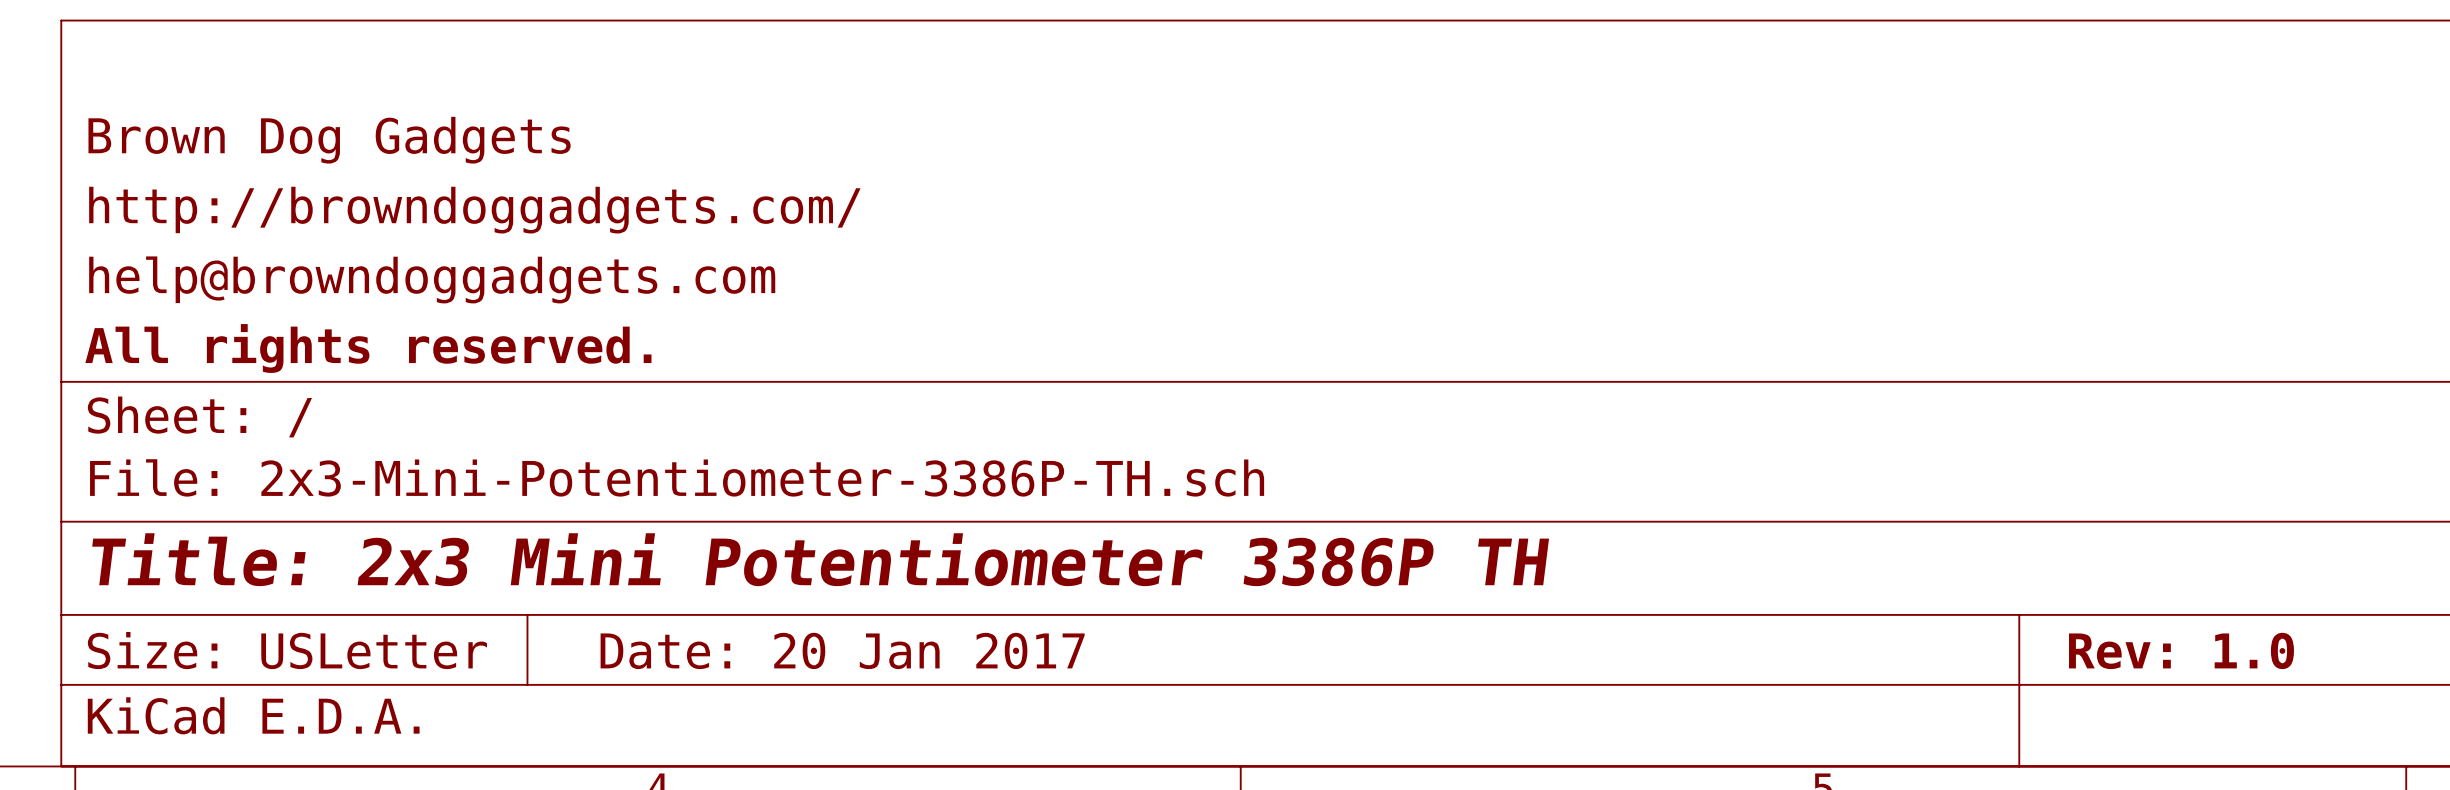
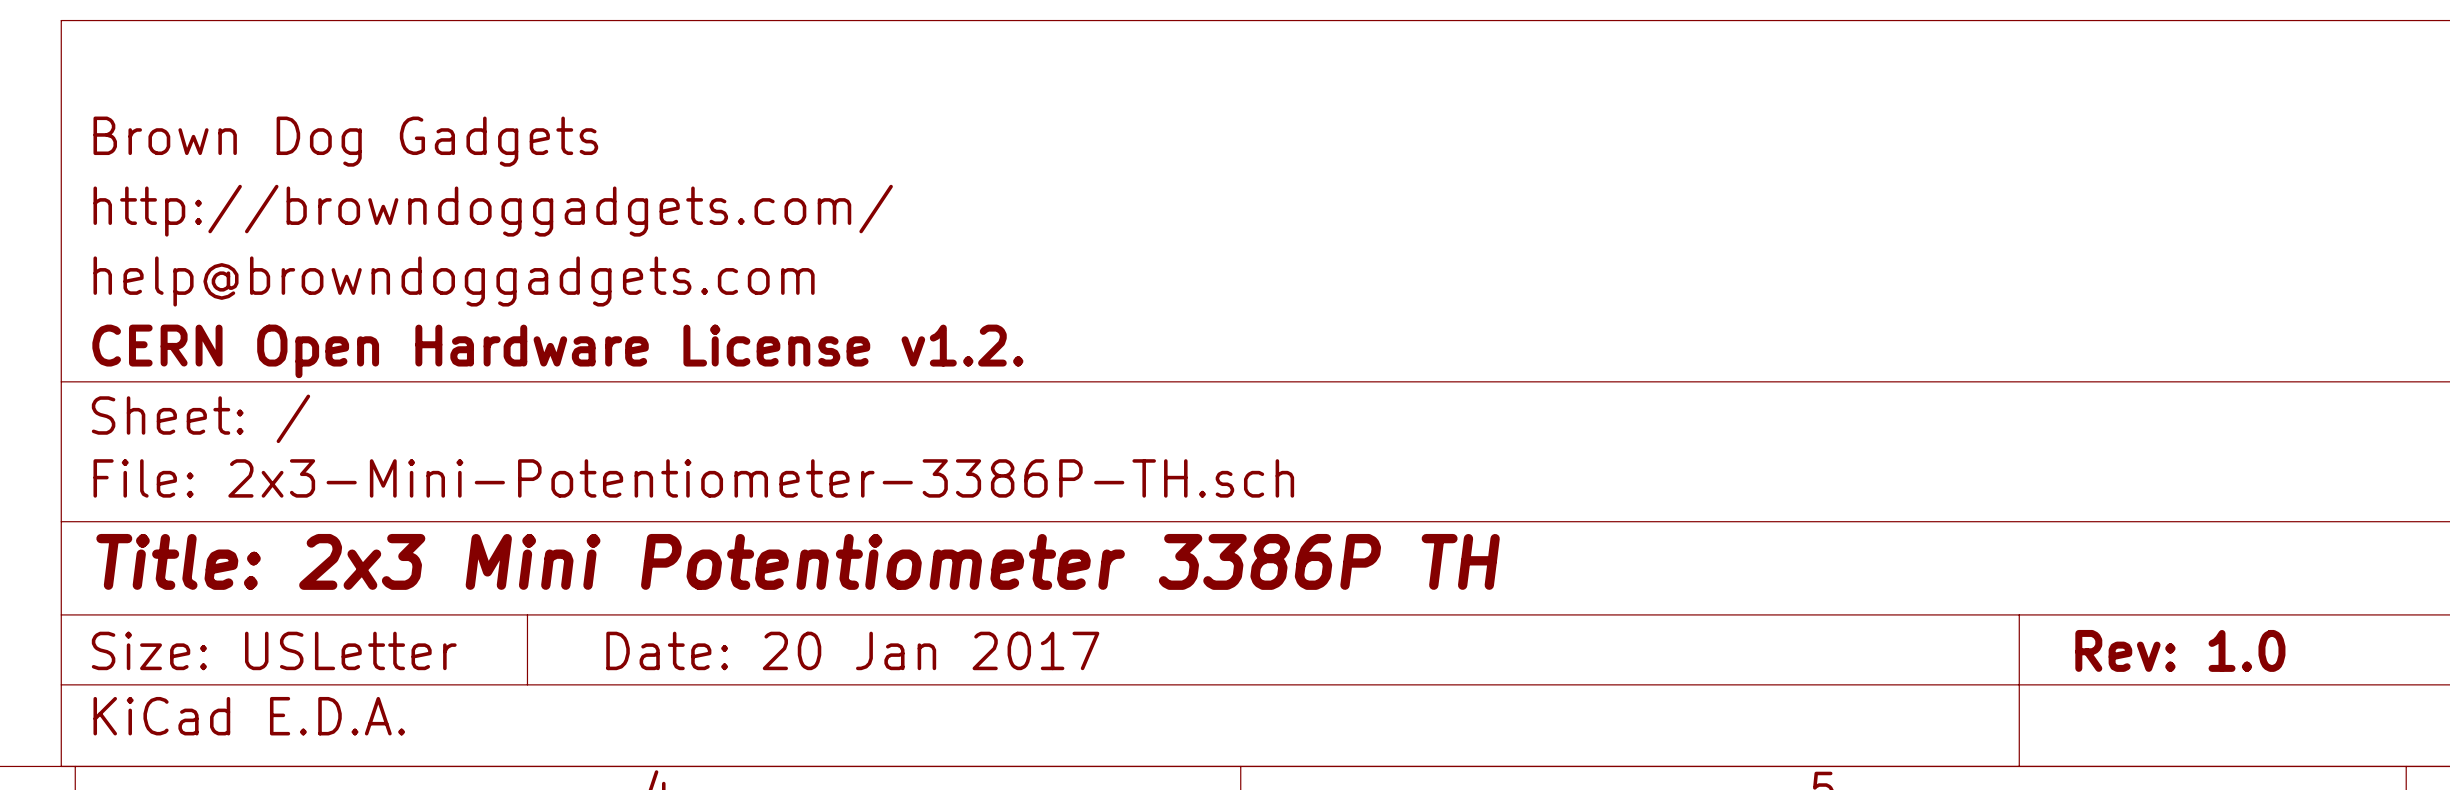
title block: All rights reserved. (368, 348) -> CERN Open Hardware License v1.2. (557, 351)

